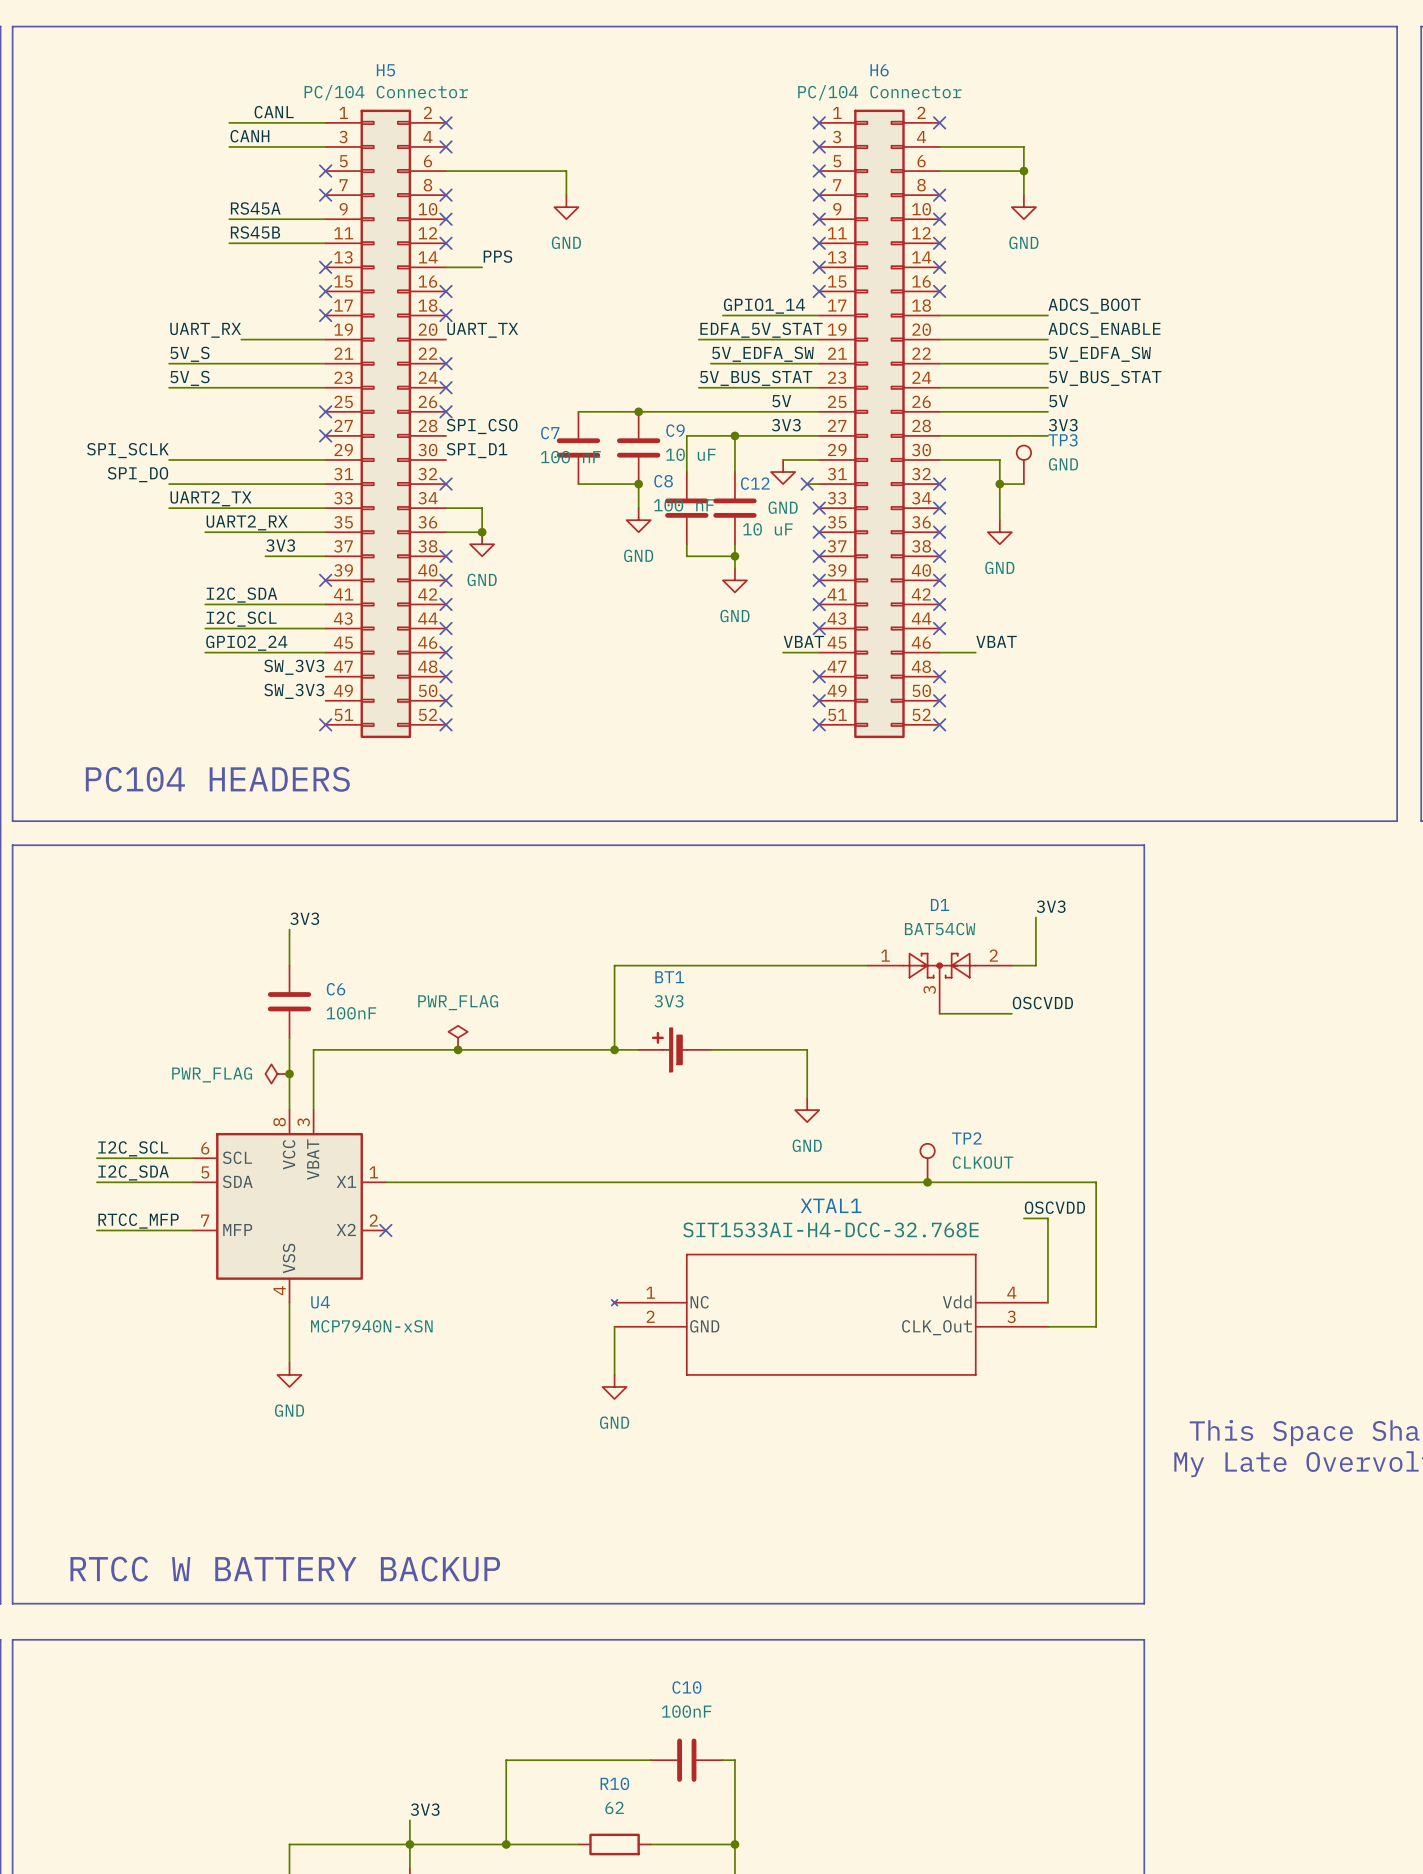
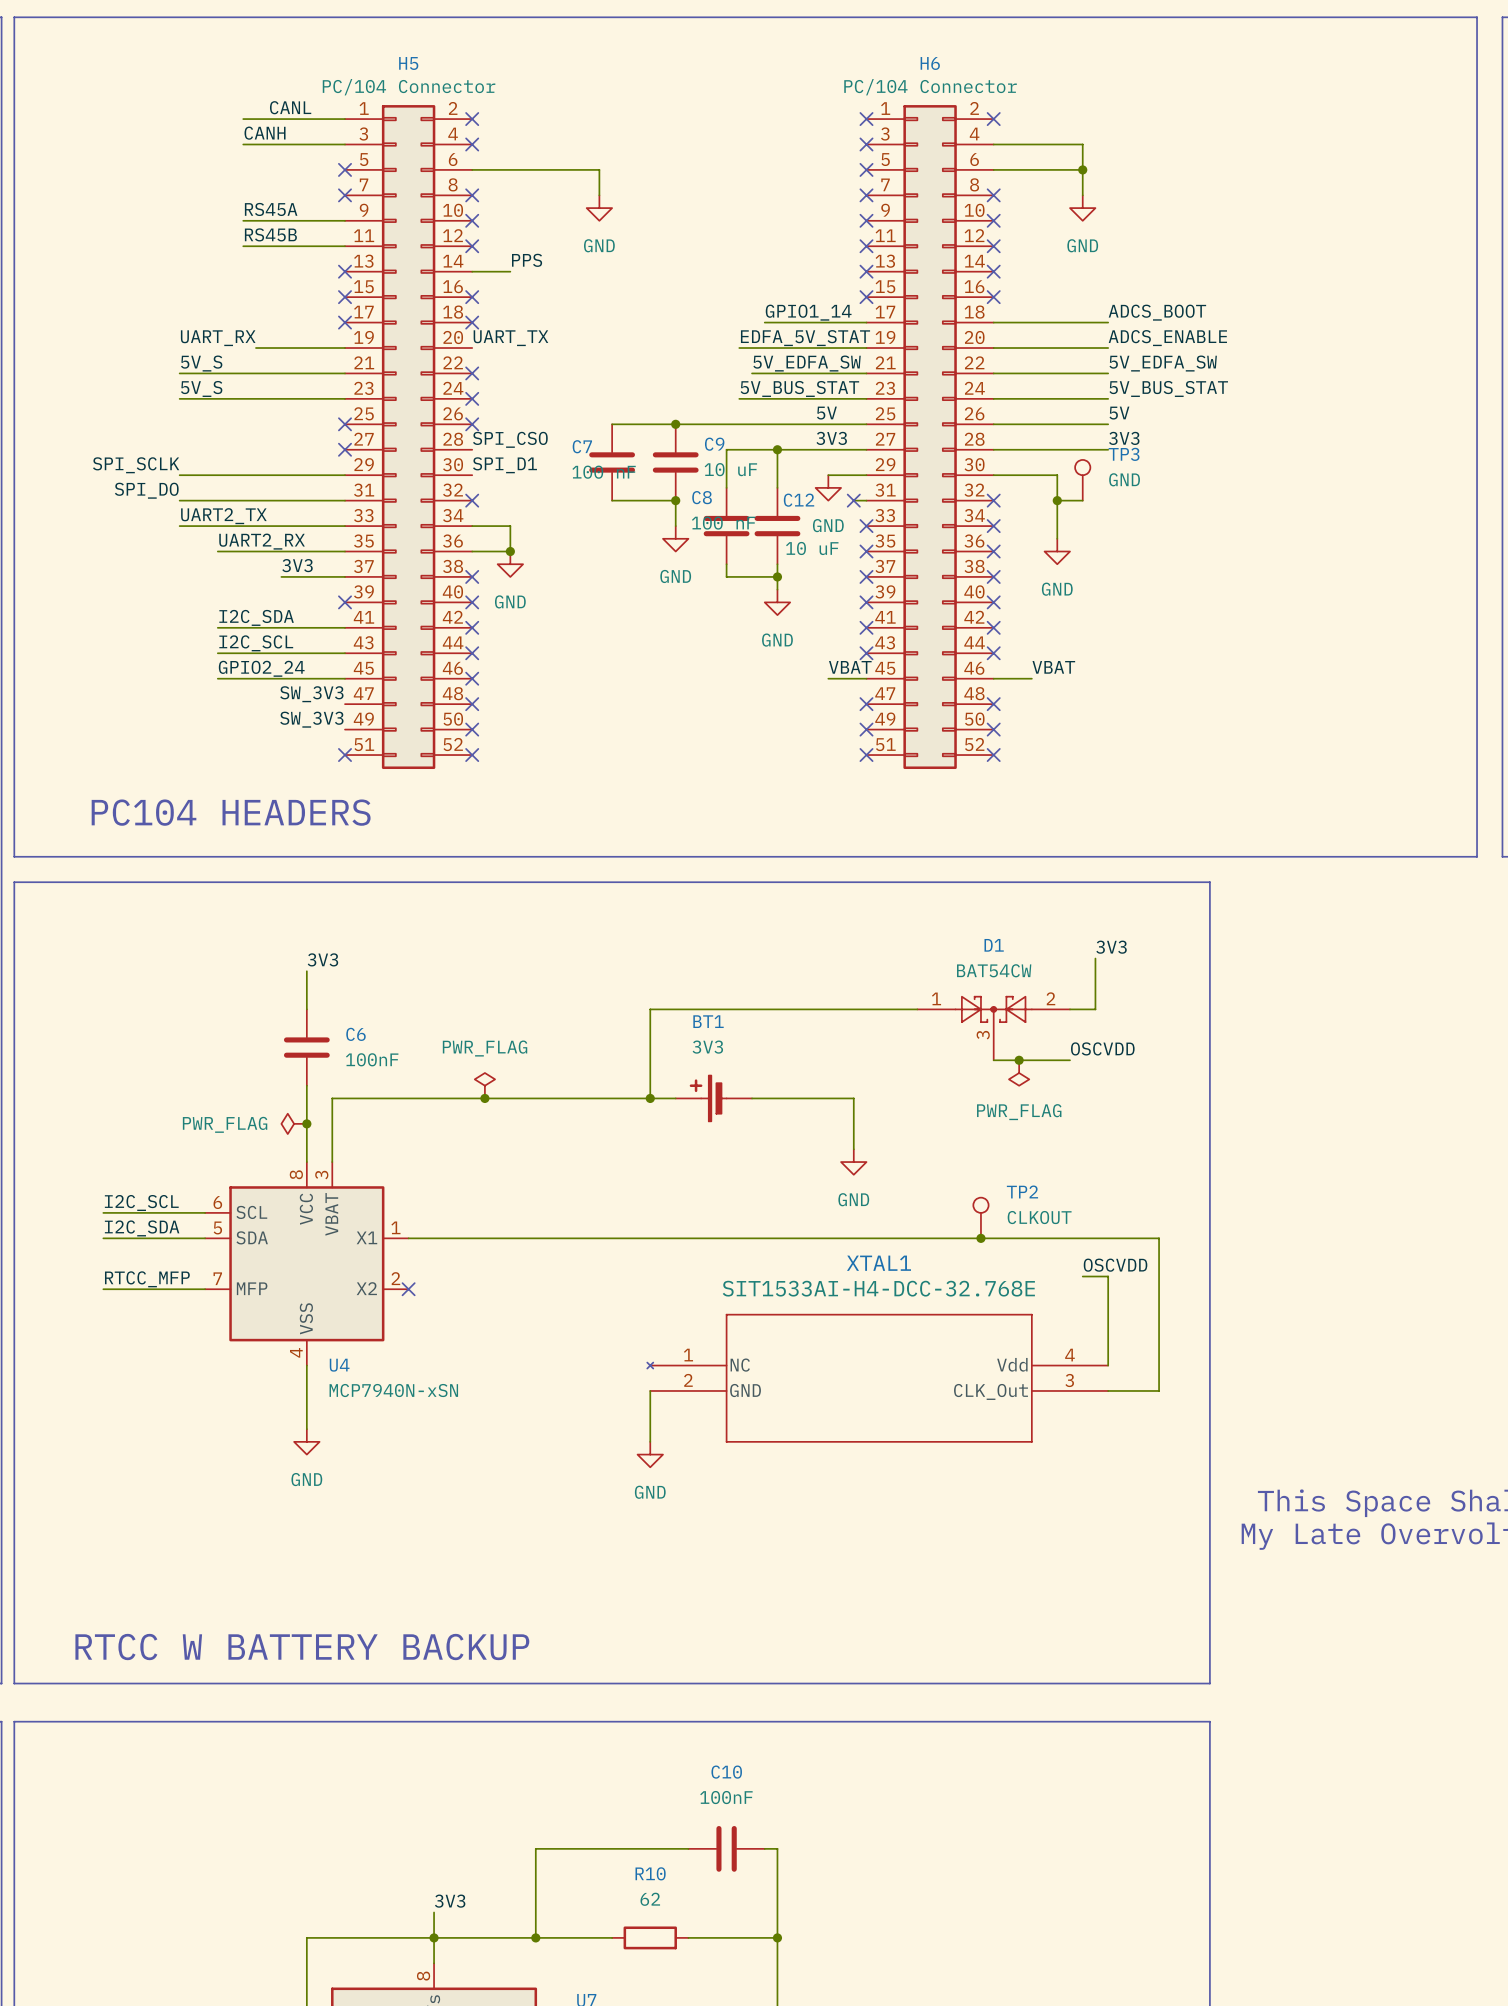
junction: none -> (1019, 1060)
power symbol: none -> PWR_FLAG (1019, 1073)

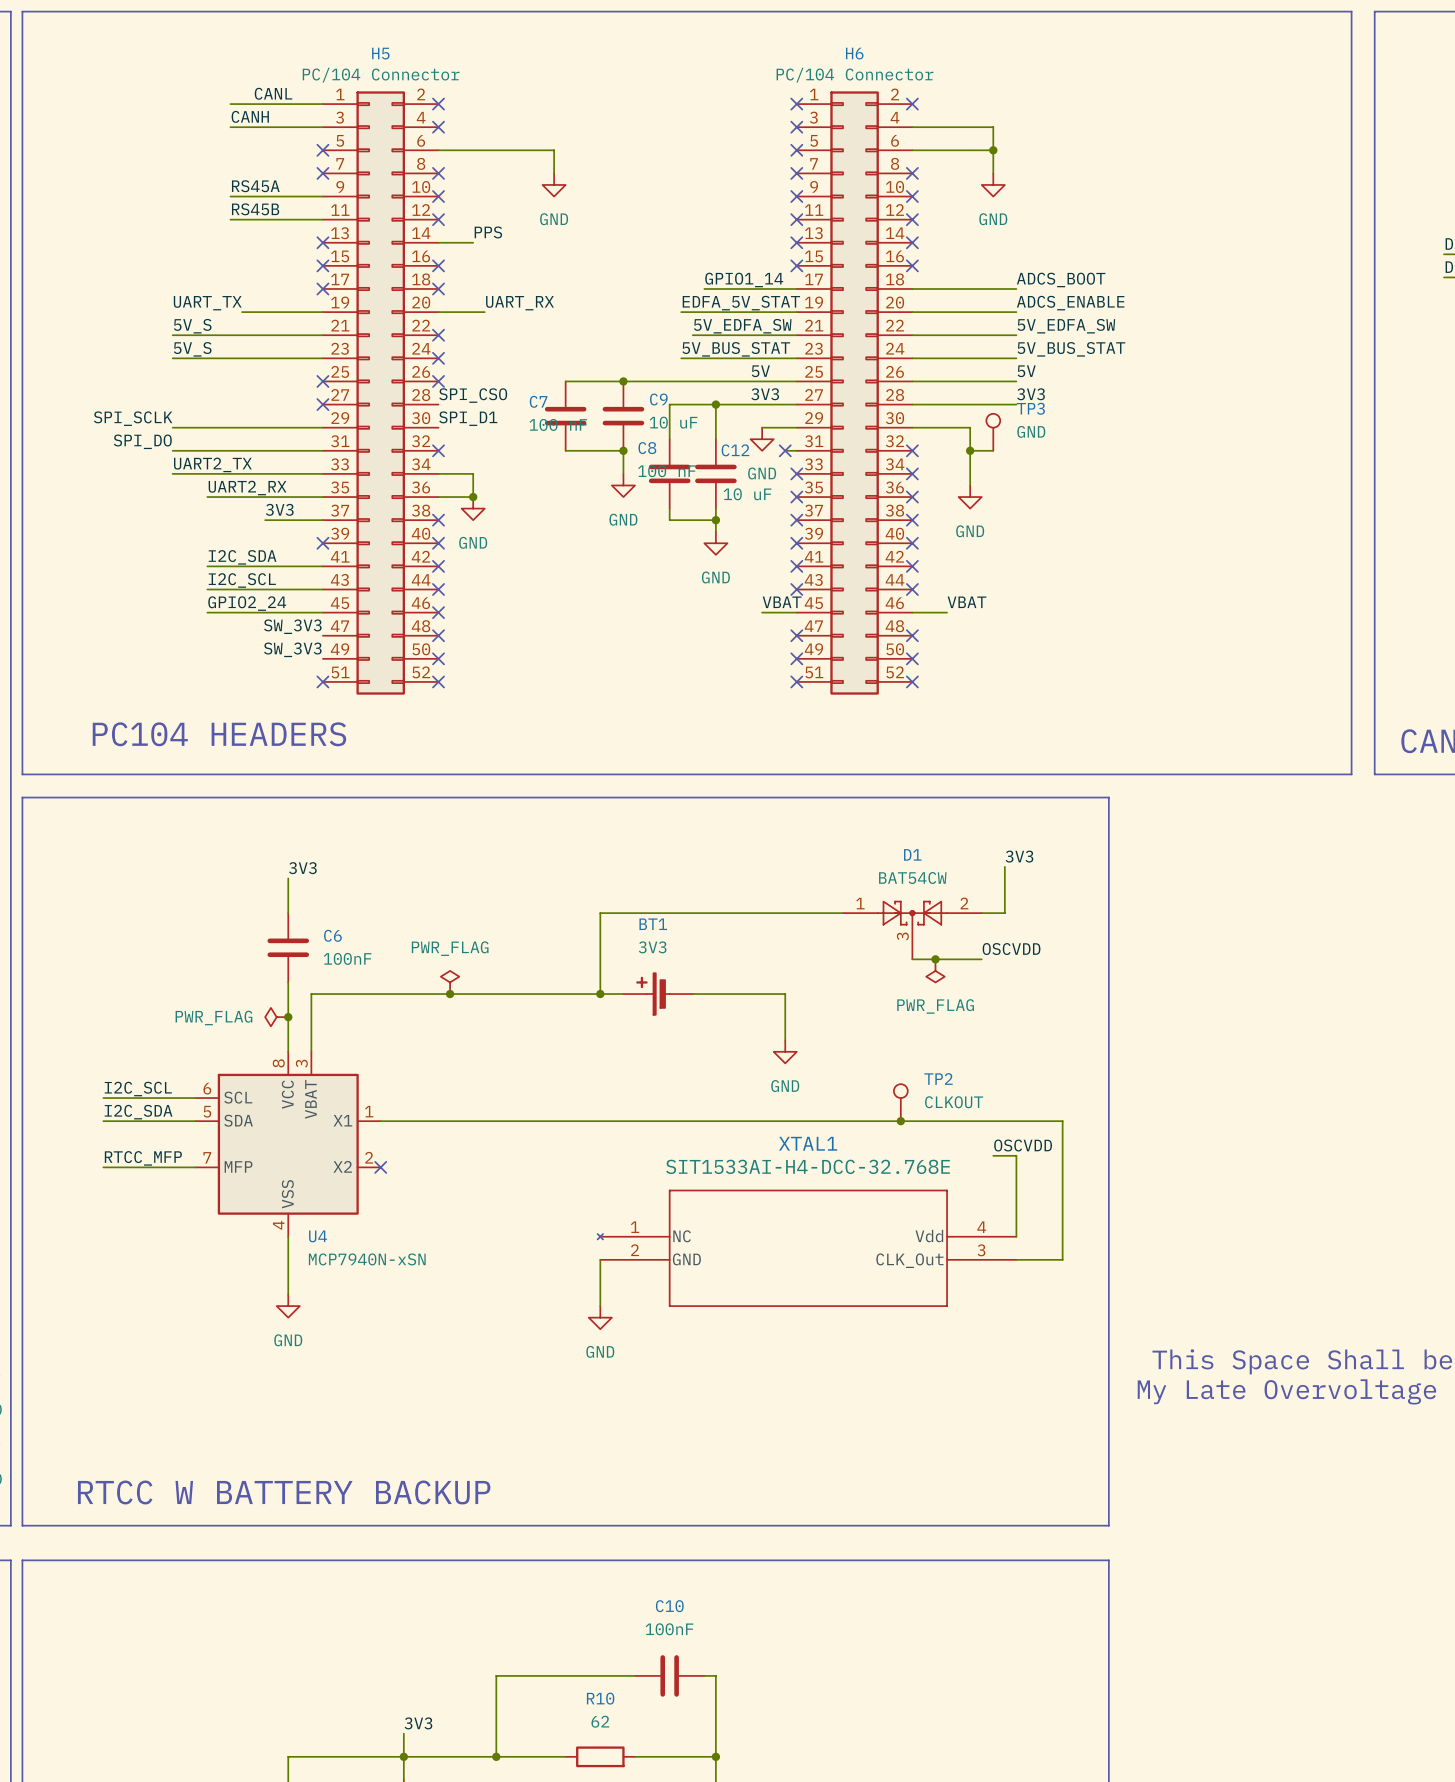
label: UART_RX (218, 338) -> UART_TX (207, 303)
label: UART_TX (510, 338) -> UART_RX (519, 303)
wire: none -> (438, 312) (484, 312)

